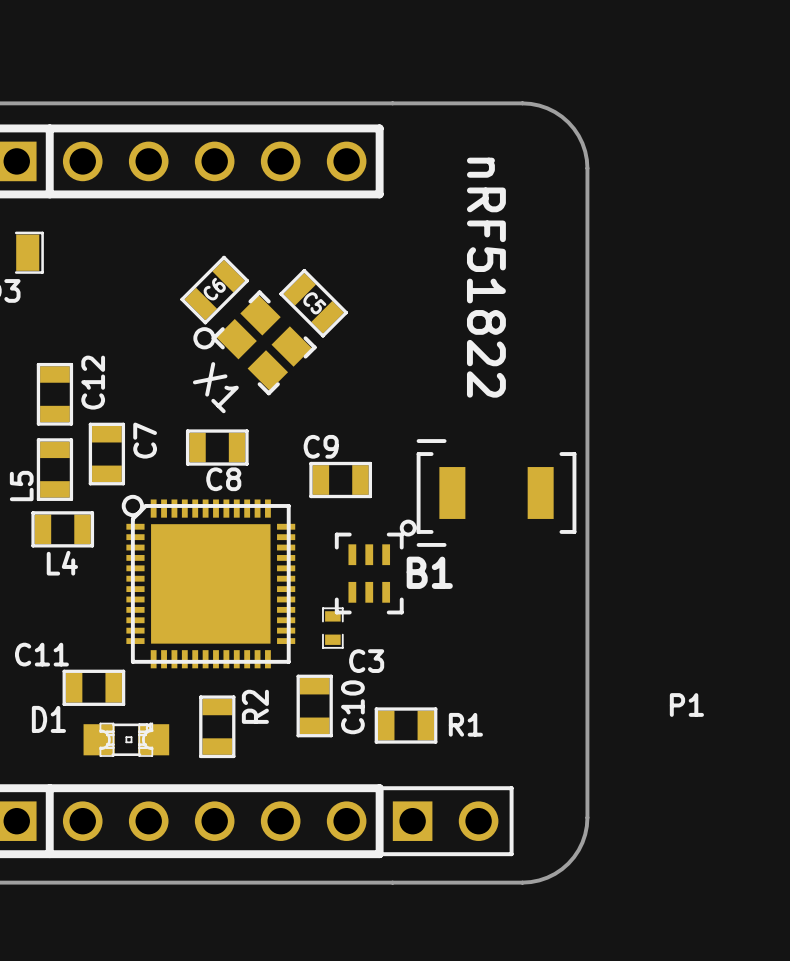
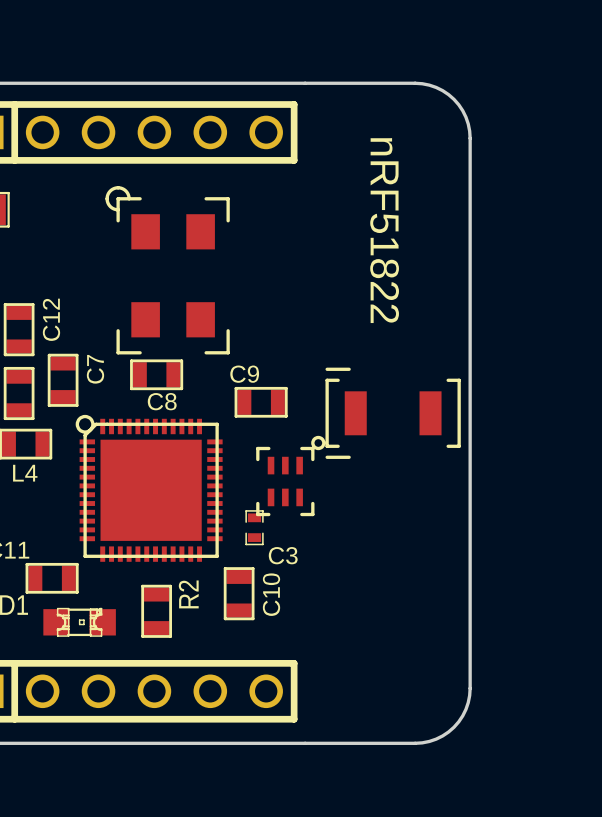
C6: (214, 290) -> none
C5: (313, 303) -> none
part: none -> (167, 270)
X1: (254, 342) -> none
B1 name: B1 (429, 572) -> none
R1: (406, 725) -> none
P1: (445, 821) -> none

